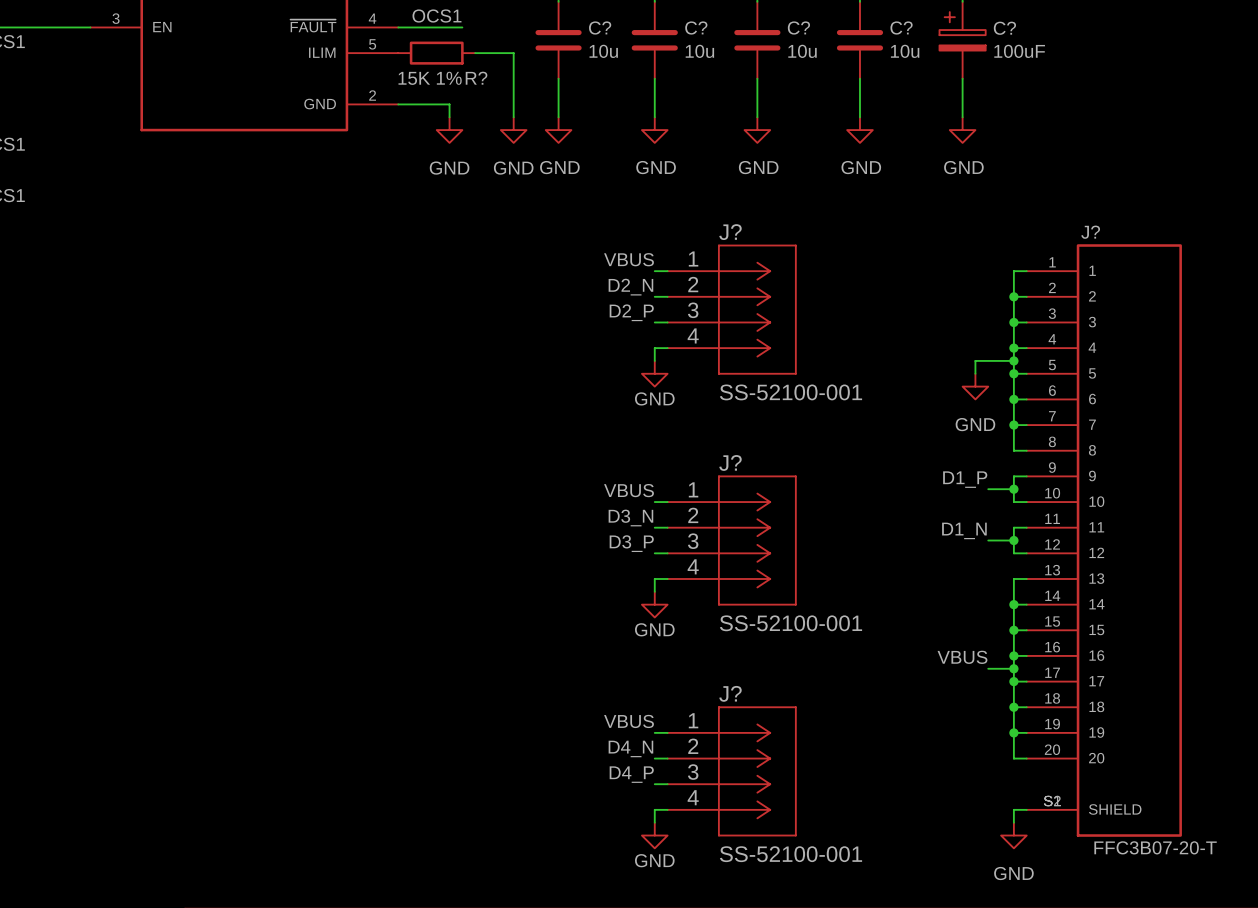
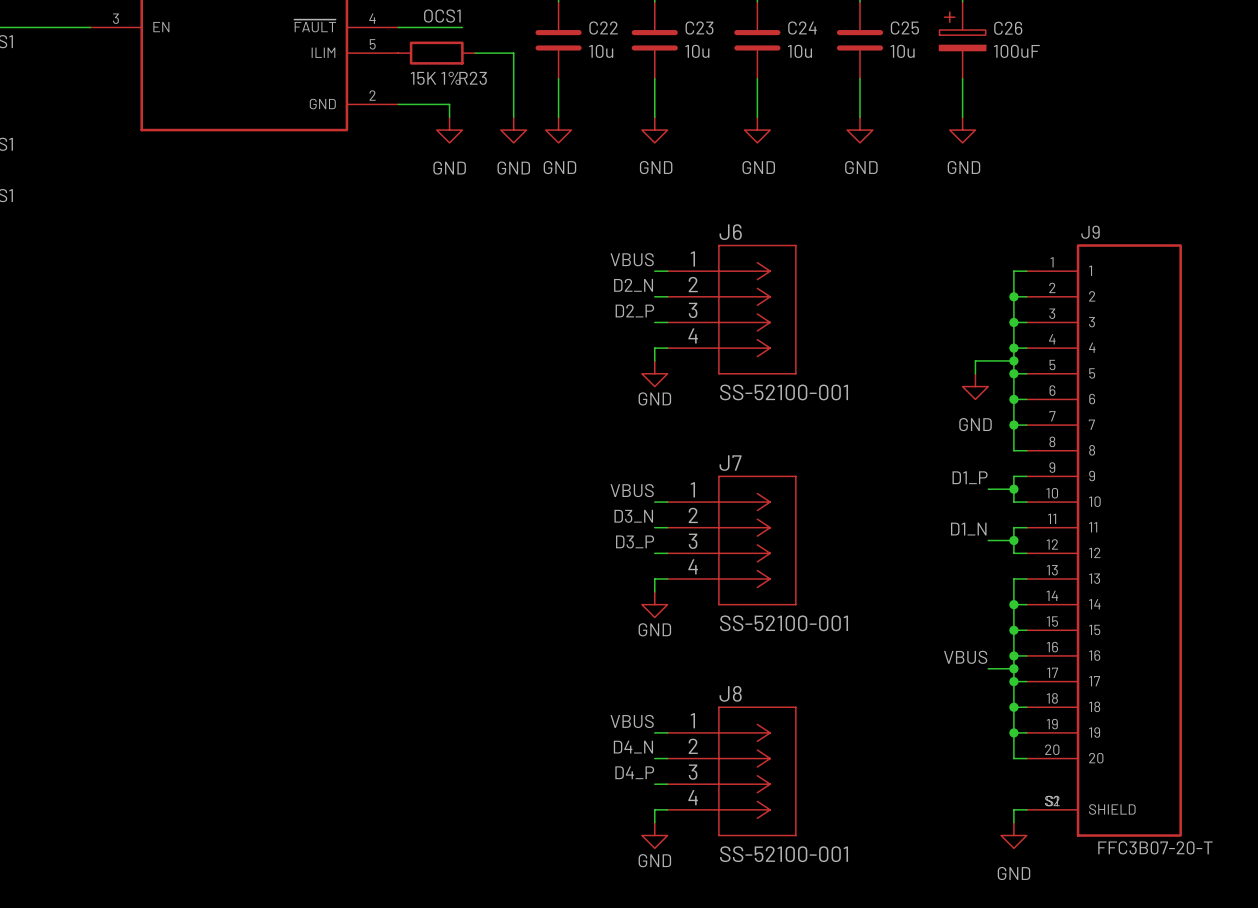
C? name: C? (600, 28) -> C22 (603, 28)
C? name: C? (696, 28) -> C23 (699, 28)
C? name: C? (798, 28) -> C24 (802, 28)
C? name: C? (901, 28) -> C25 (904, 28)
C? name: C? (1004, 28) -> C26 (1008, 28)
R? name: R? (476, 78) -> R23 (473, 78)
J? name: J? (730, 232) -> J6 (730, 232)
J? name: J? (1090, 232) -> J9 (1090, 232)
J? name: J? (730, 462) -> J7 (730, 463)
J? name: J? (730, 693) -> J8 (730, 693)

